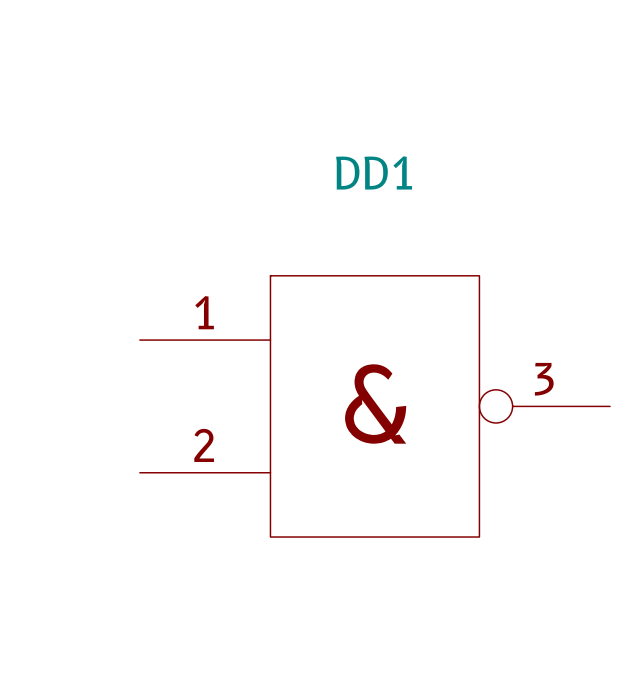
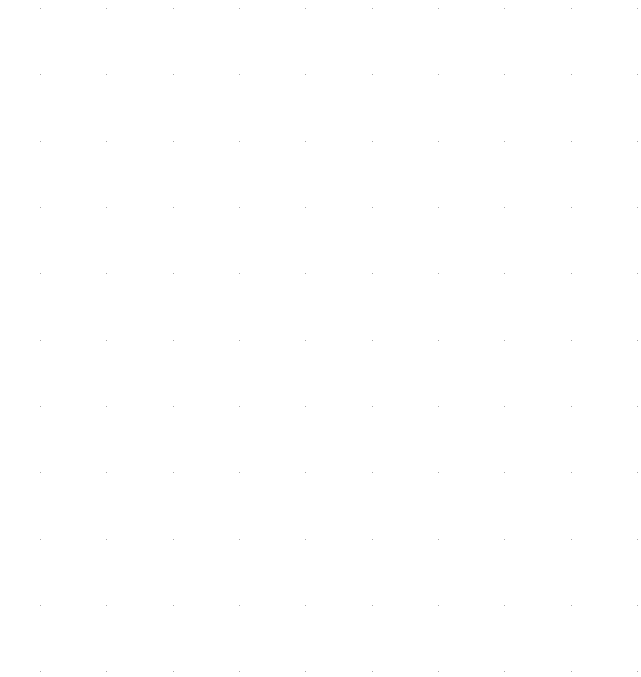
DD1: (374, 406) -> none

